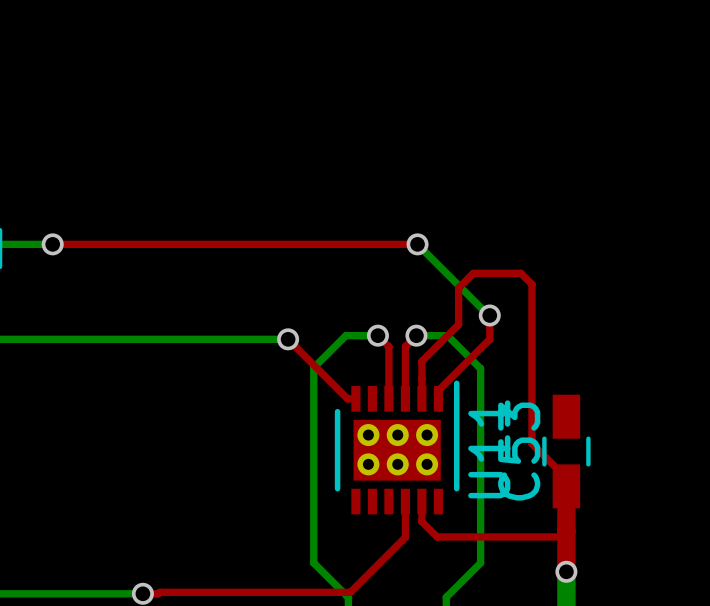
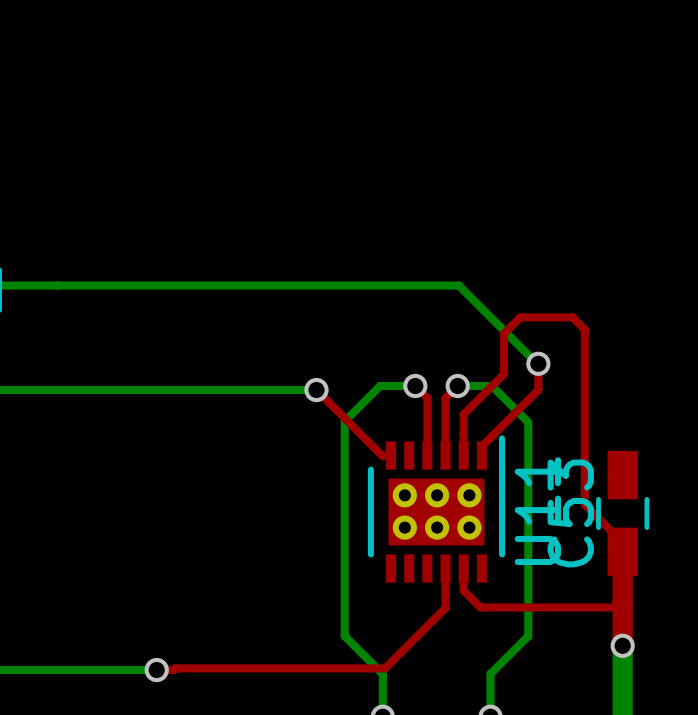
bottom track: none -> (57, 285) (458, 285)
top track: (52, 244) (417, 244) -> none
via: (52, 244) -> none
via: (417, 244) -> none

